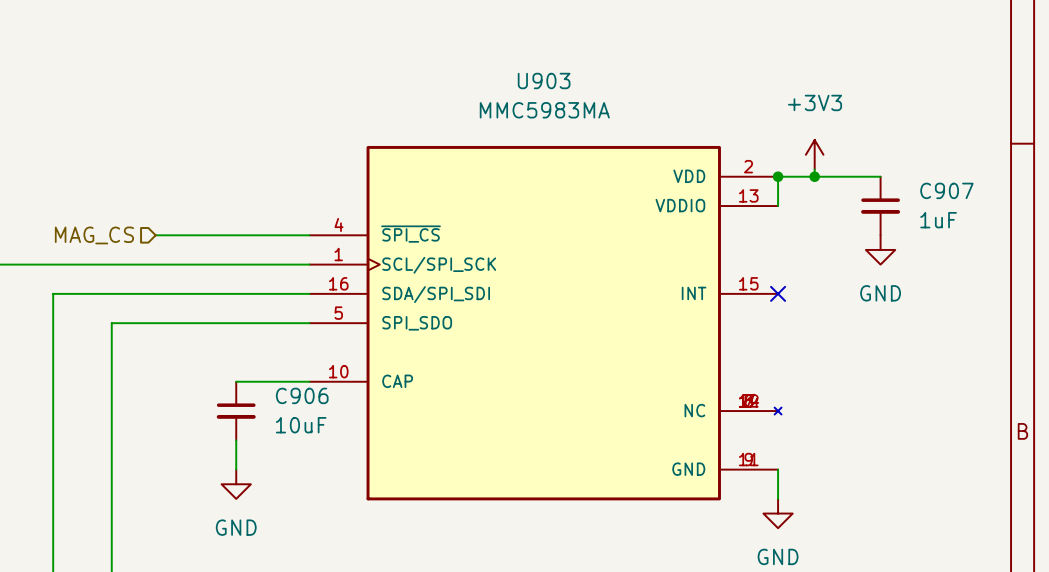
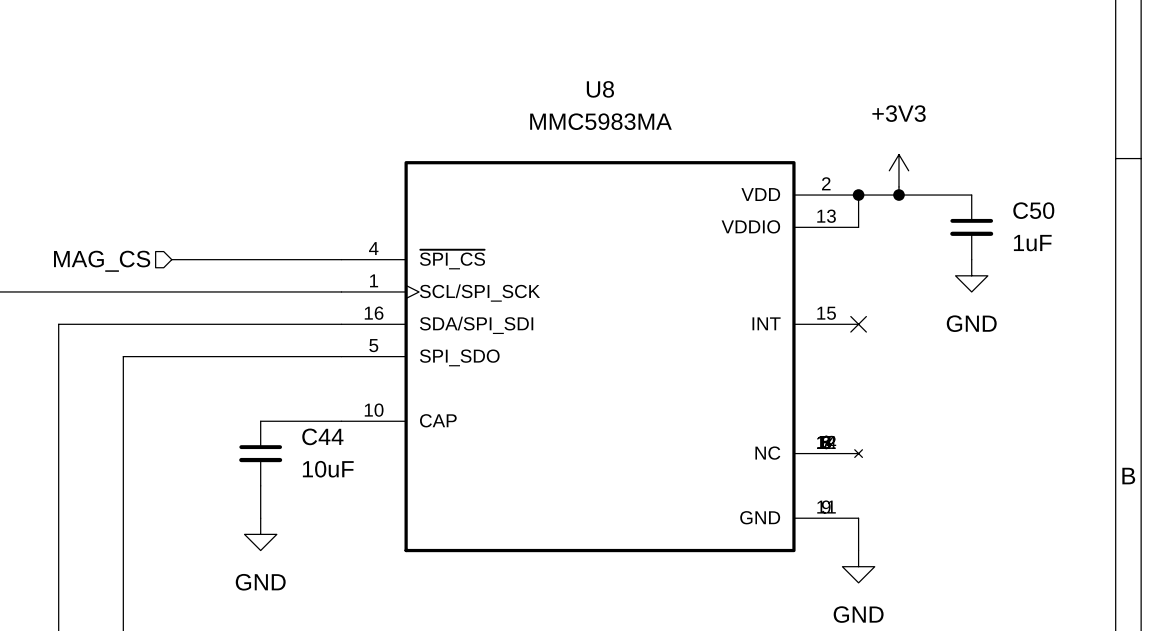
U903 name: U903 (544, 80) -> U8 (600, 89)
C907 name: C907 (946, 190) -> C50 (1033, 210)
C906 name: C906 (302, 395) -> C44 (322, 436)

